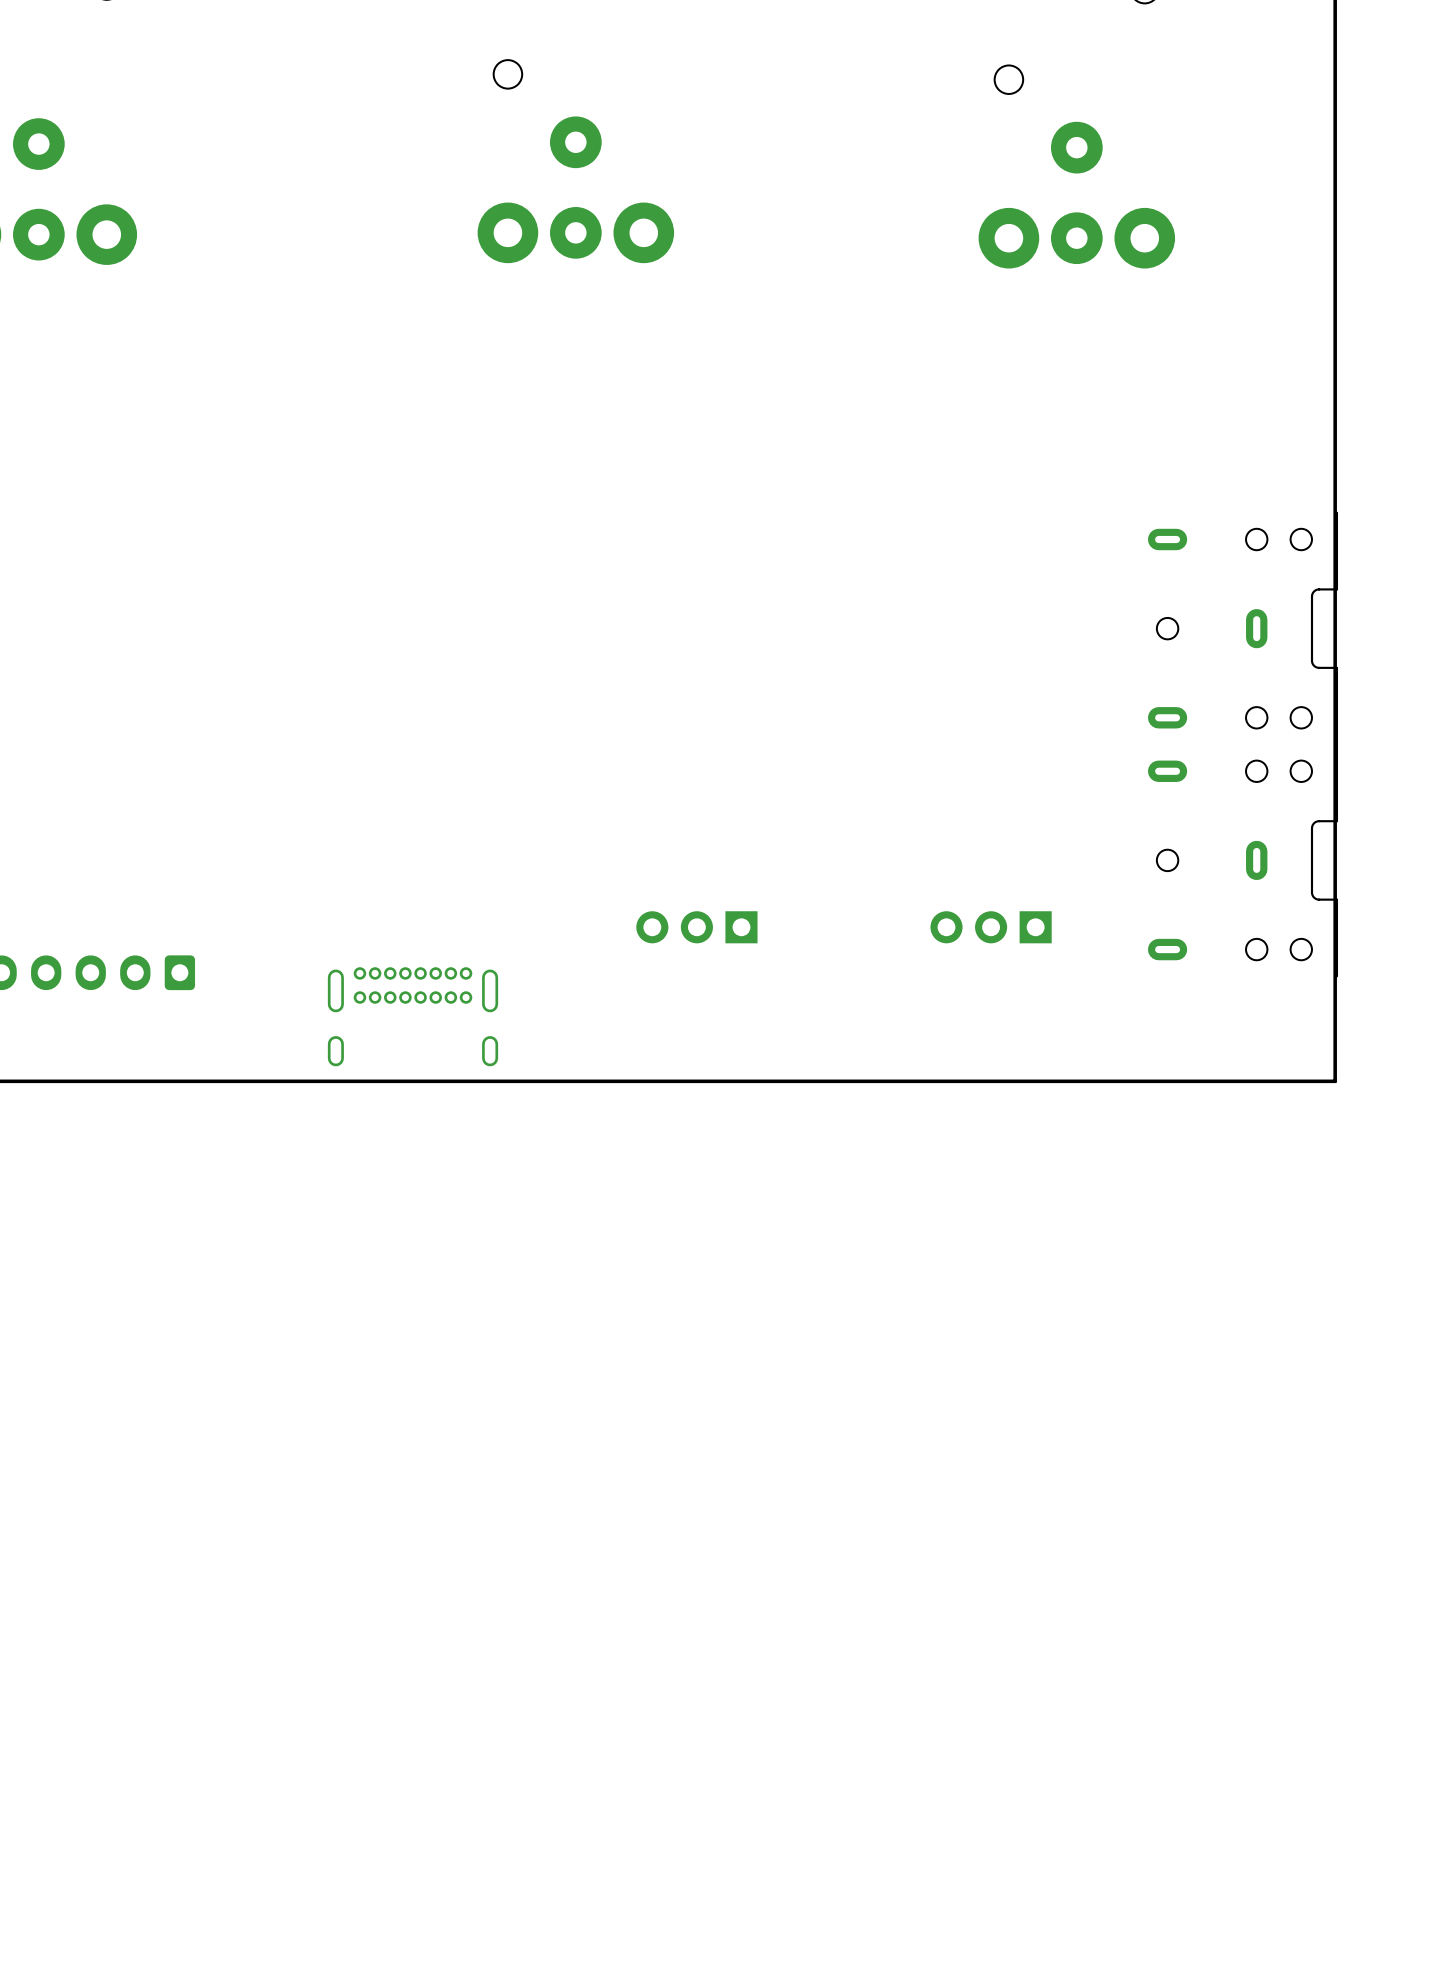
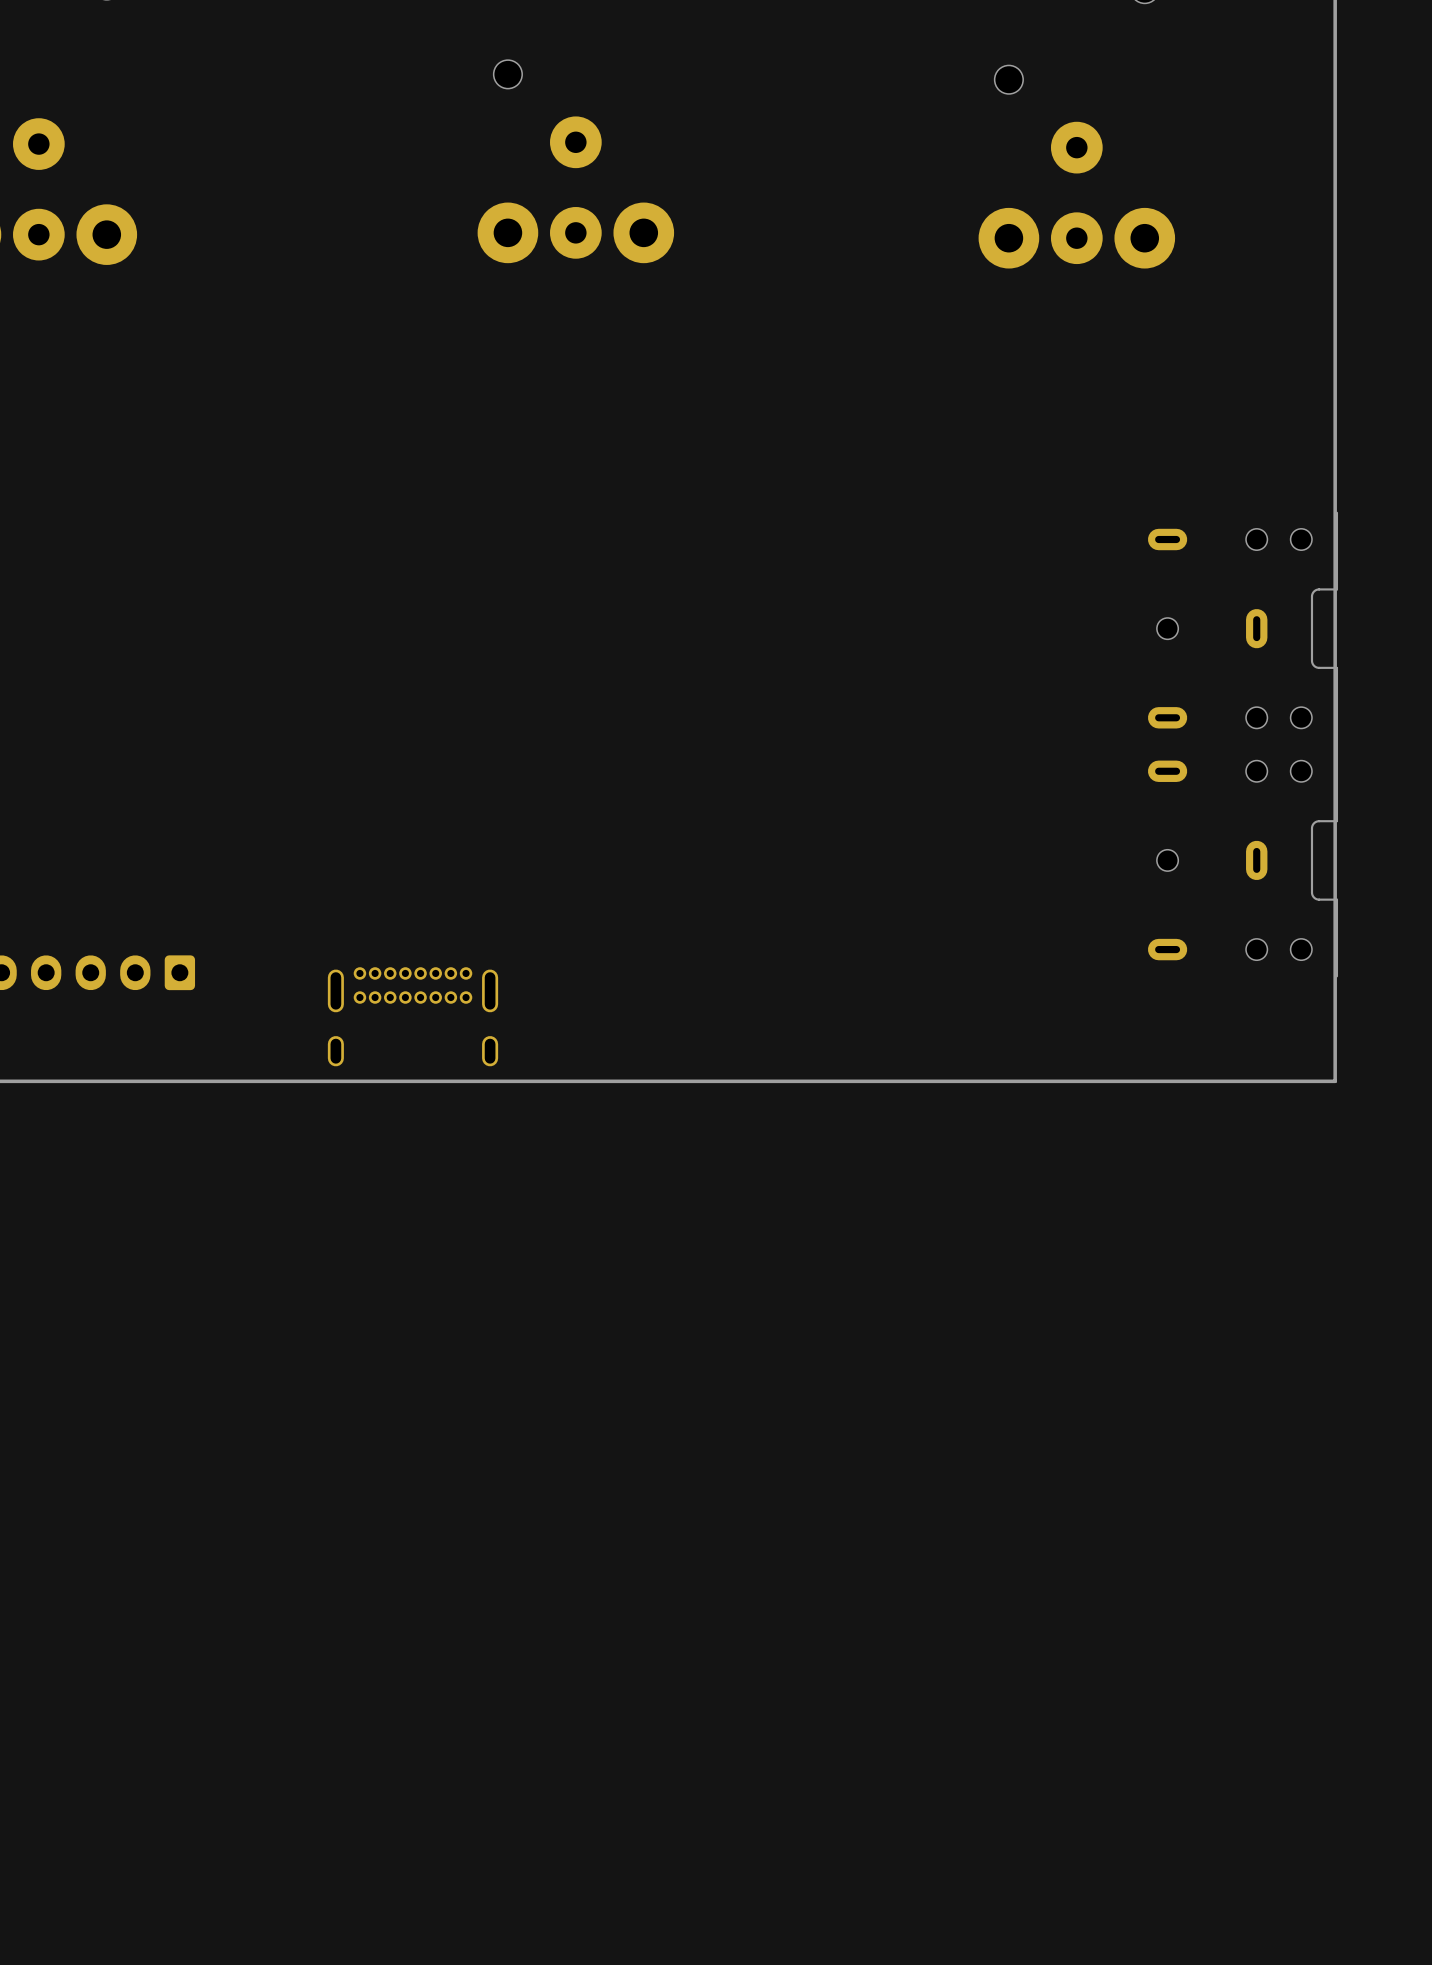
part: (696, 927) -> none
part: (991, 927) -> none

